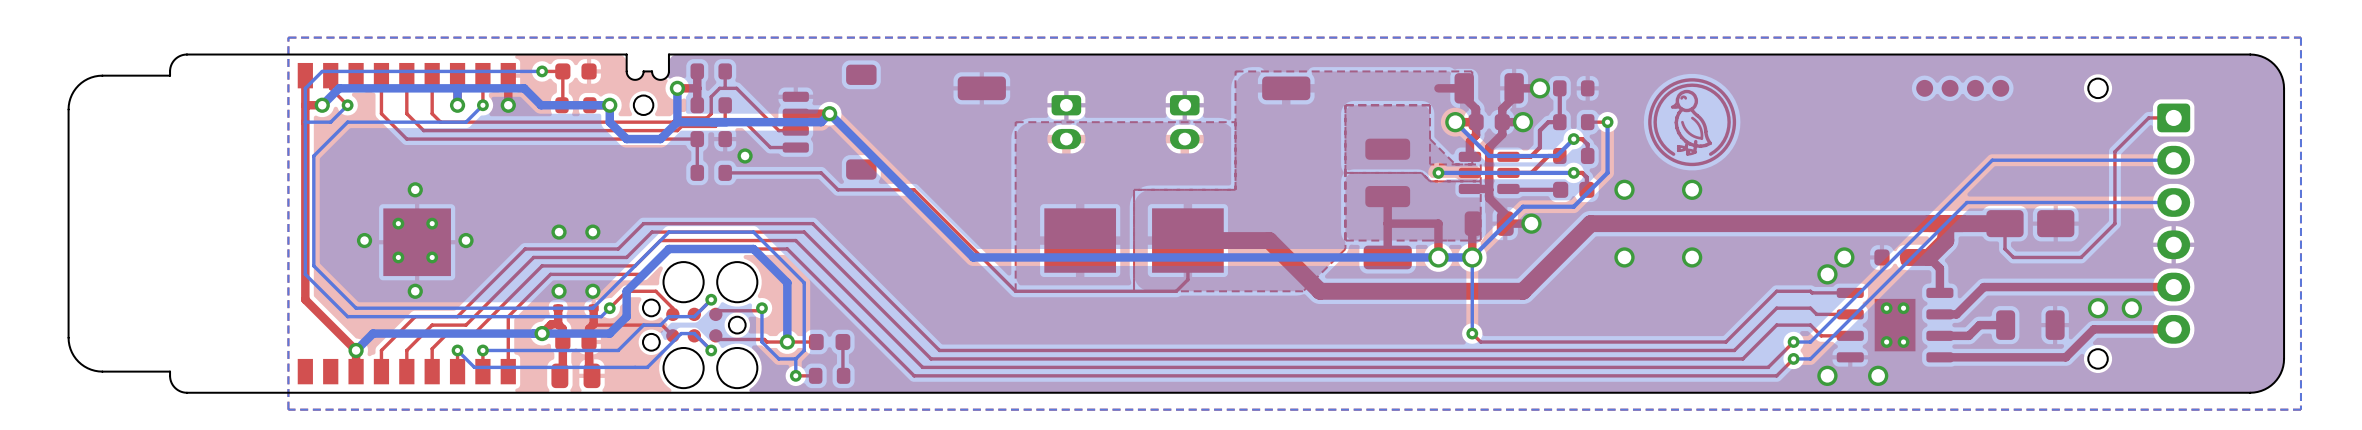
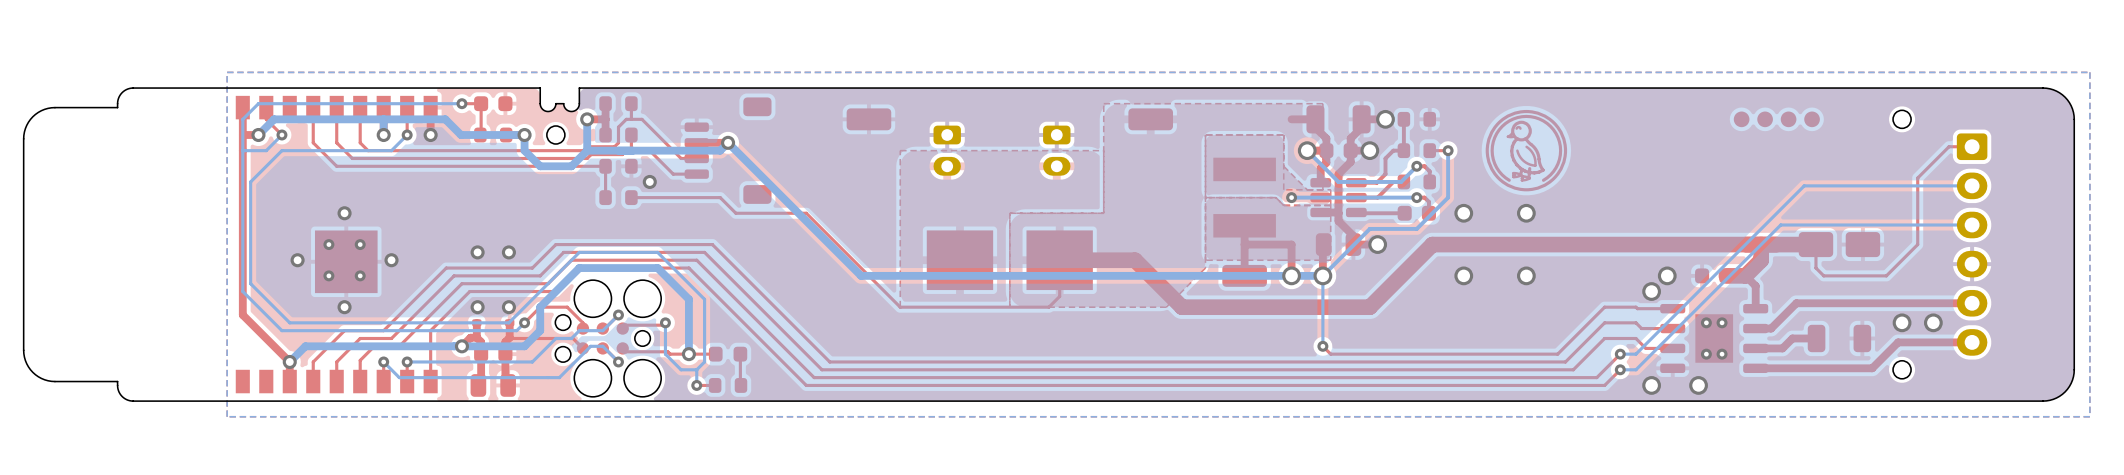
part footprint: [1365, 138, 1411, 208] -> [1213, 157, 1276, 238]

